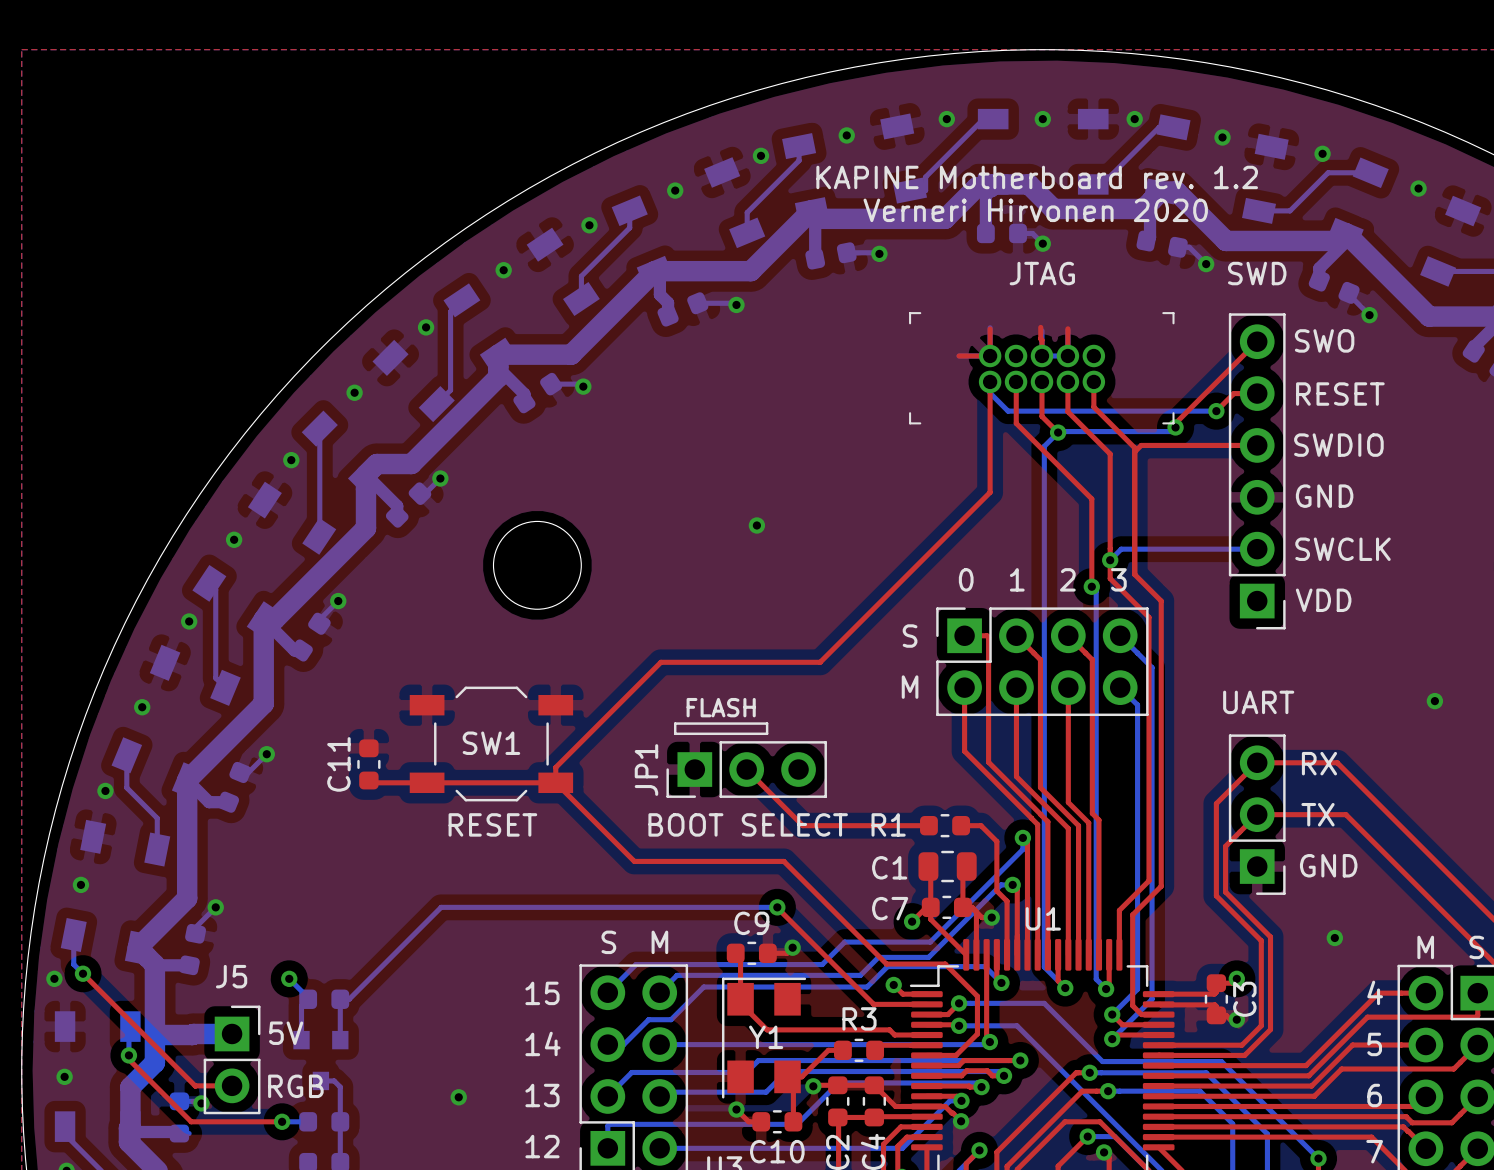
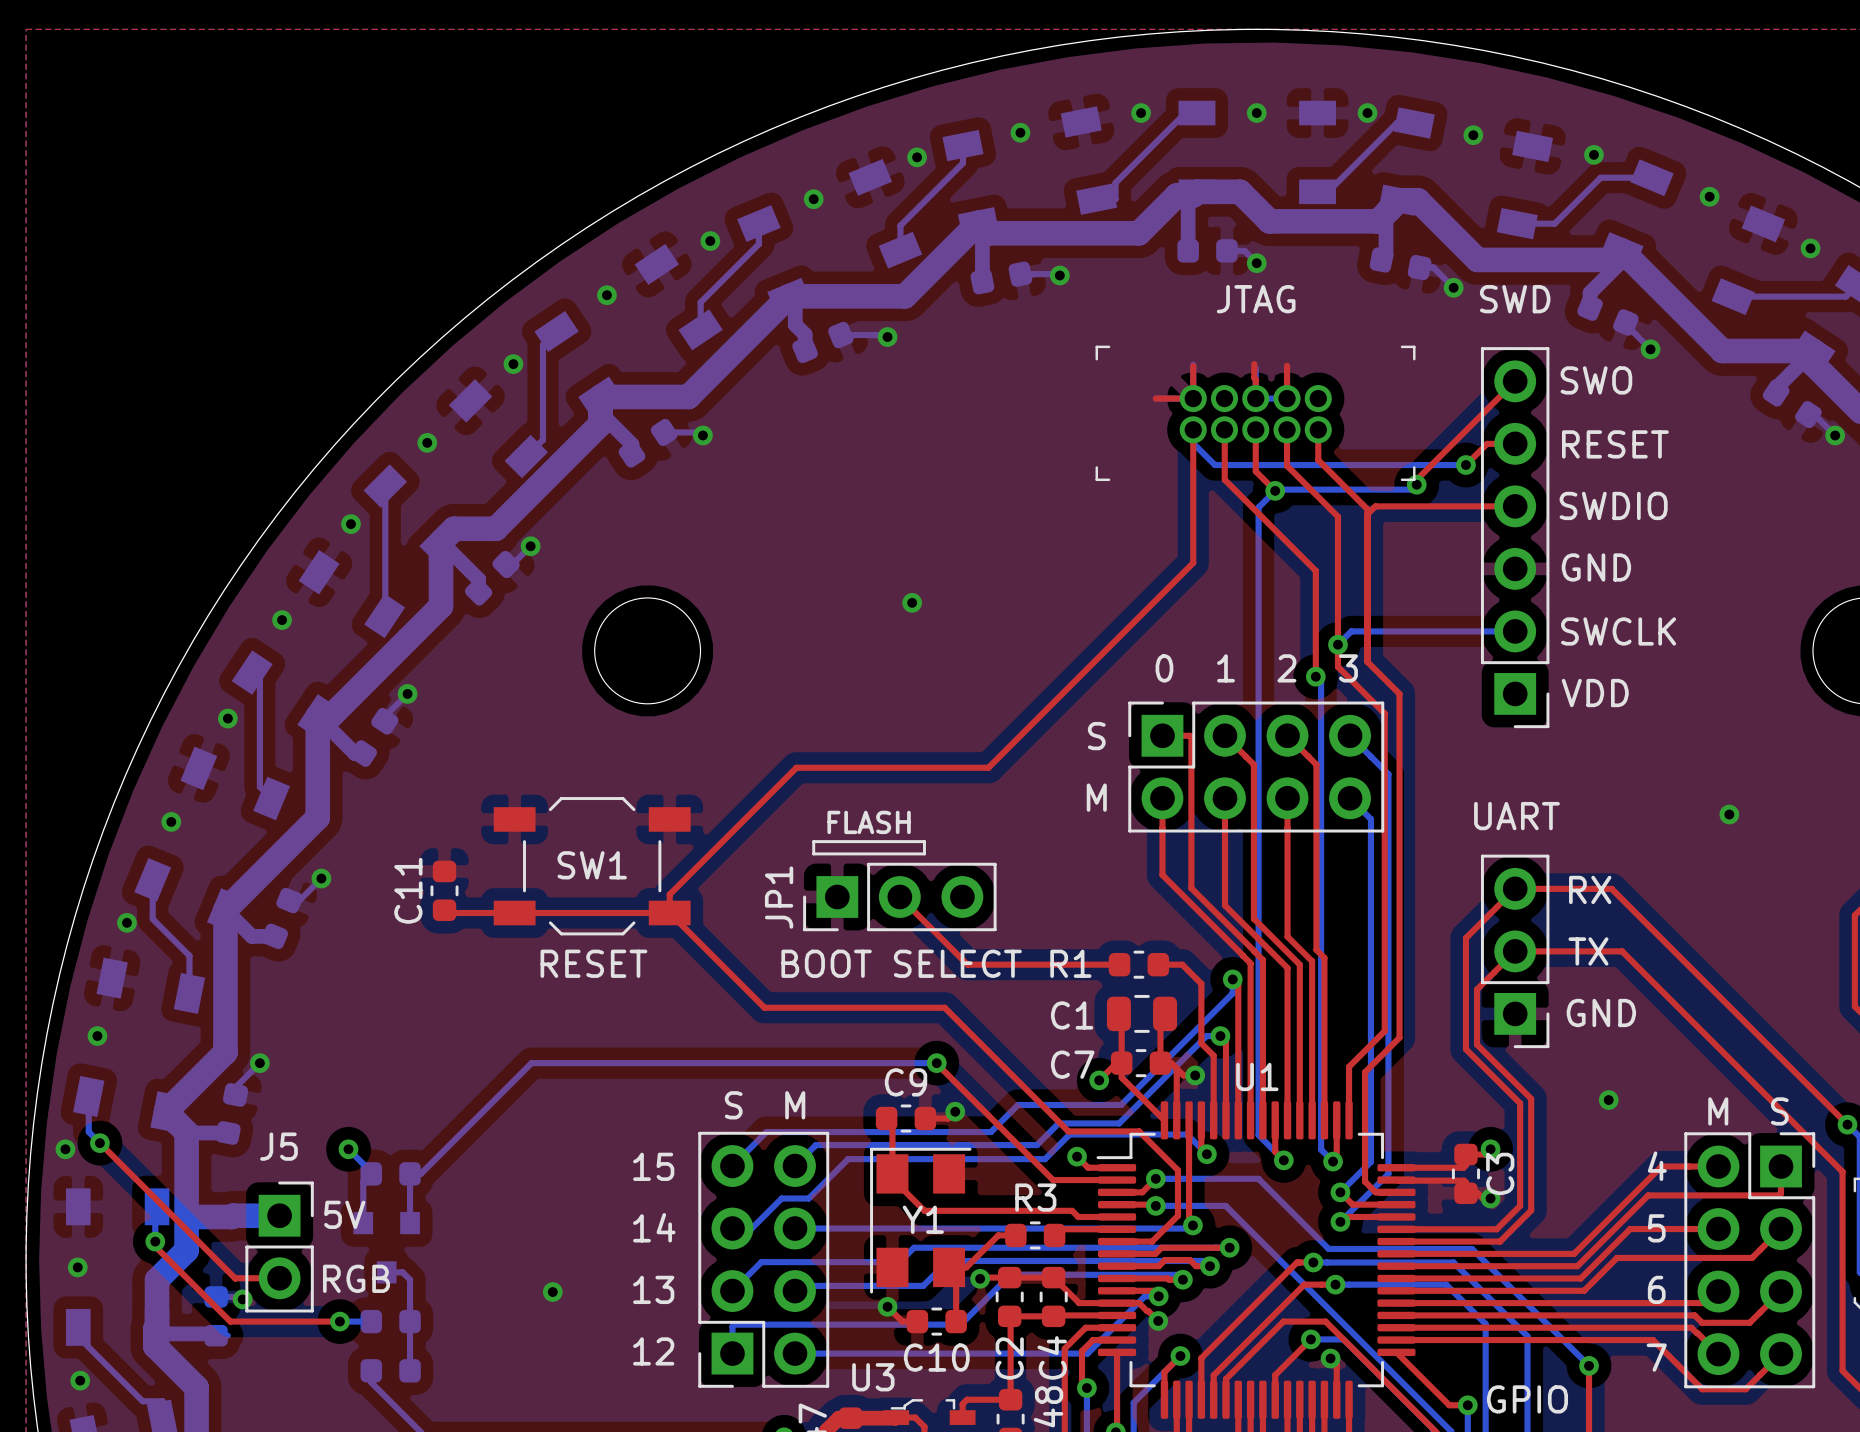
text: KAPINE Motherboard rev. 1.2 (1037, 177) -> none
text: Verneri Hirvonen 2020 (1035, 210) -> none

